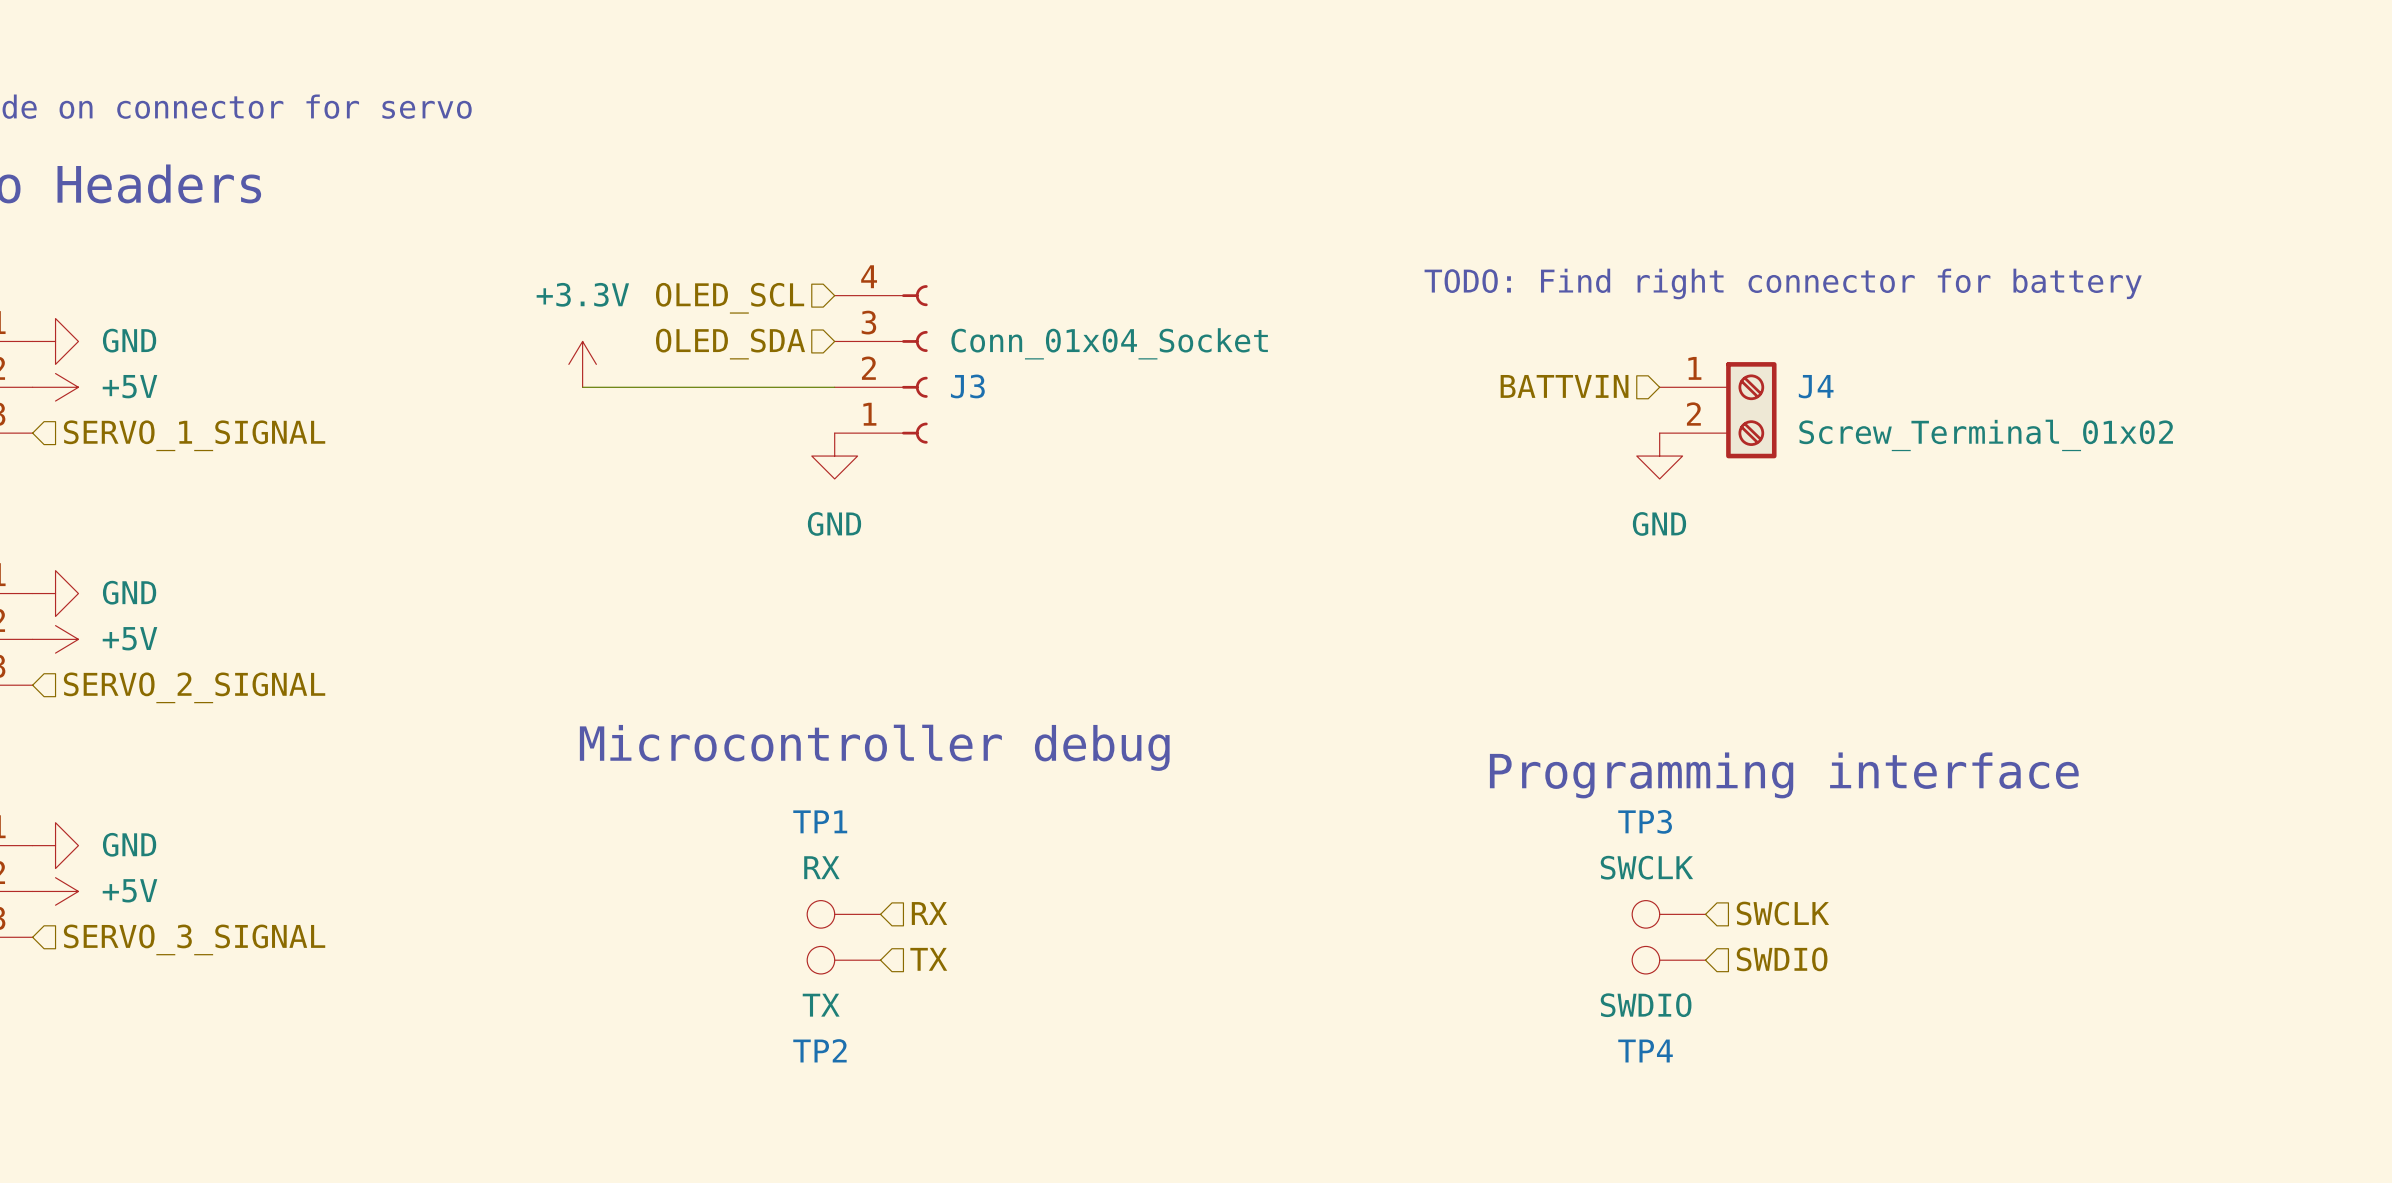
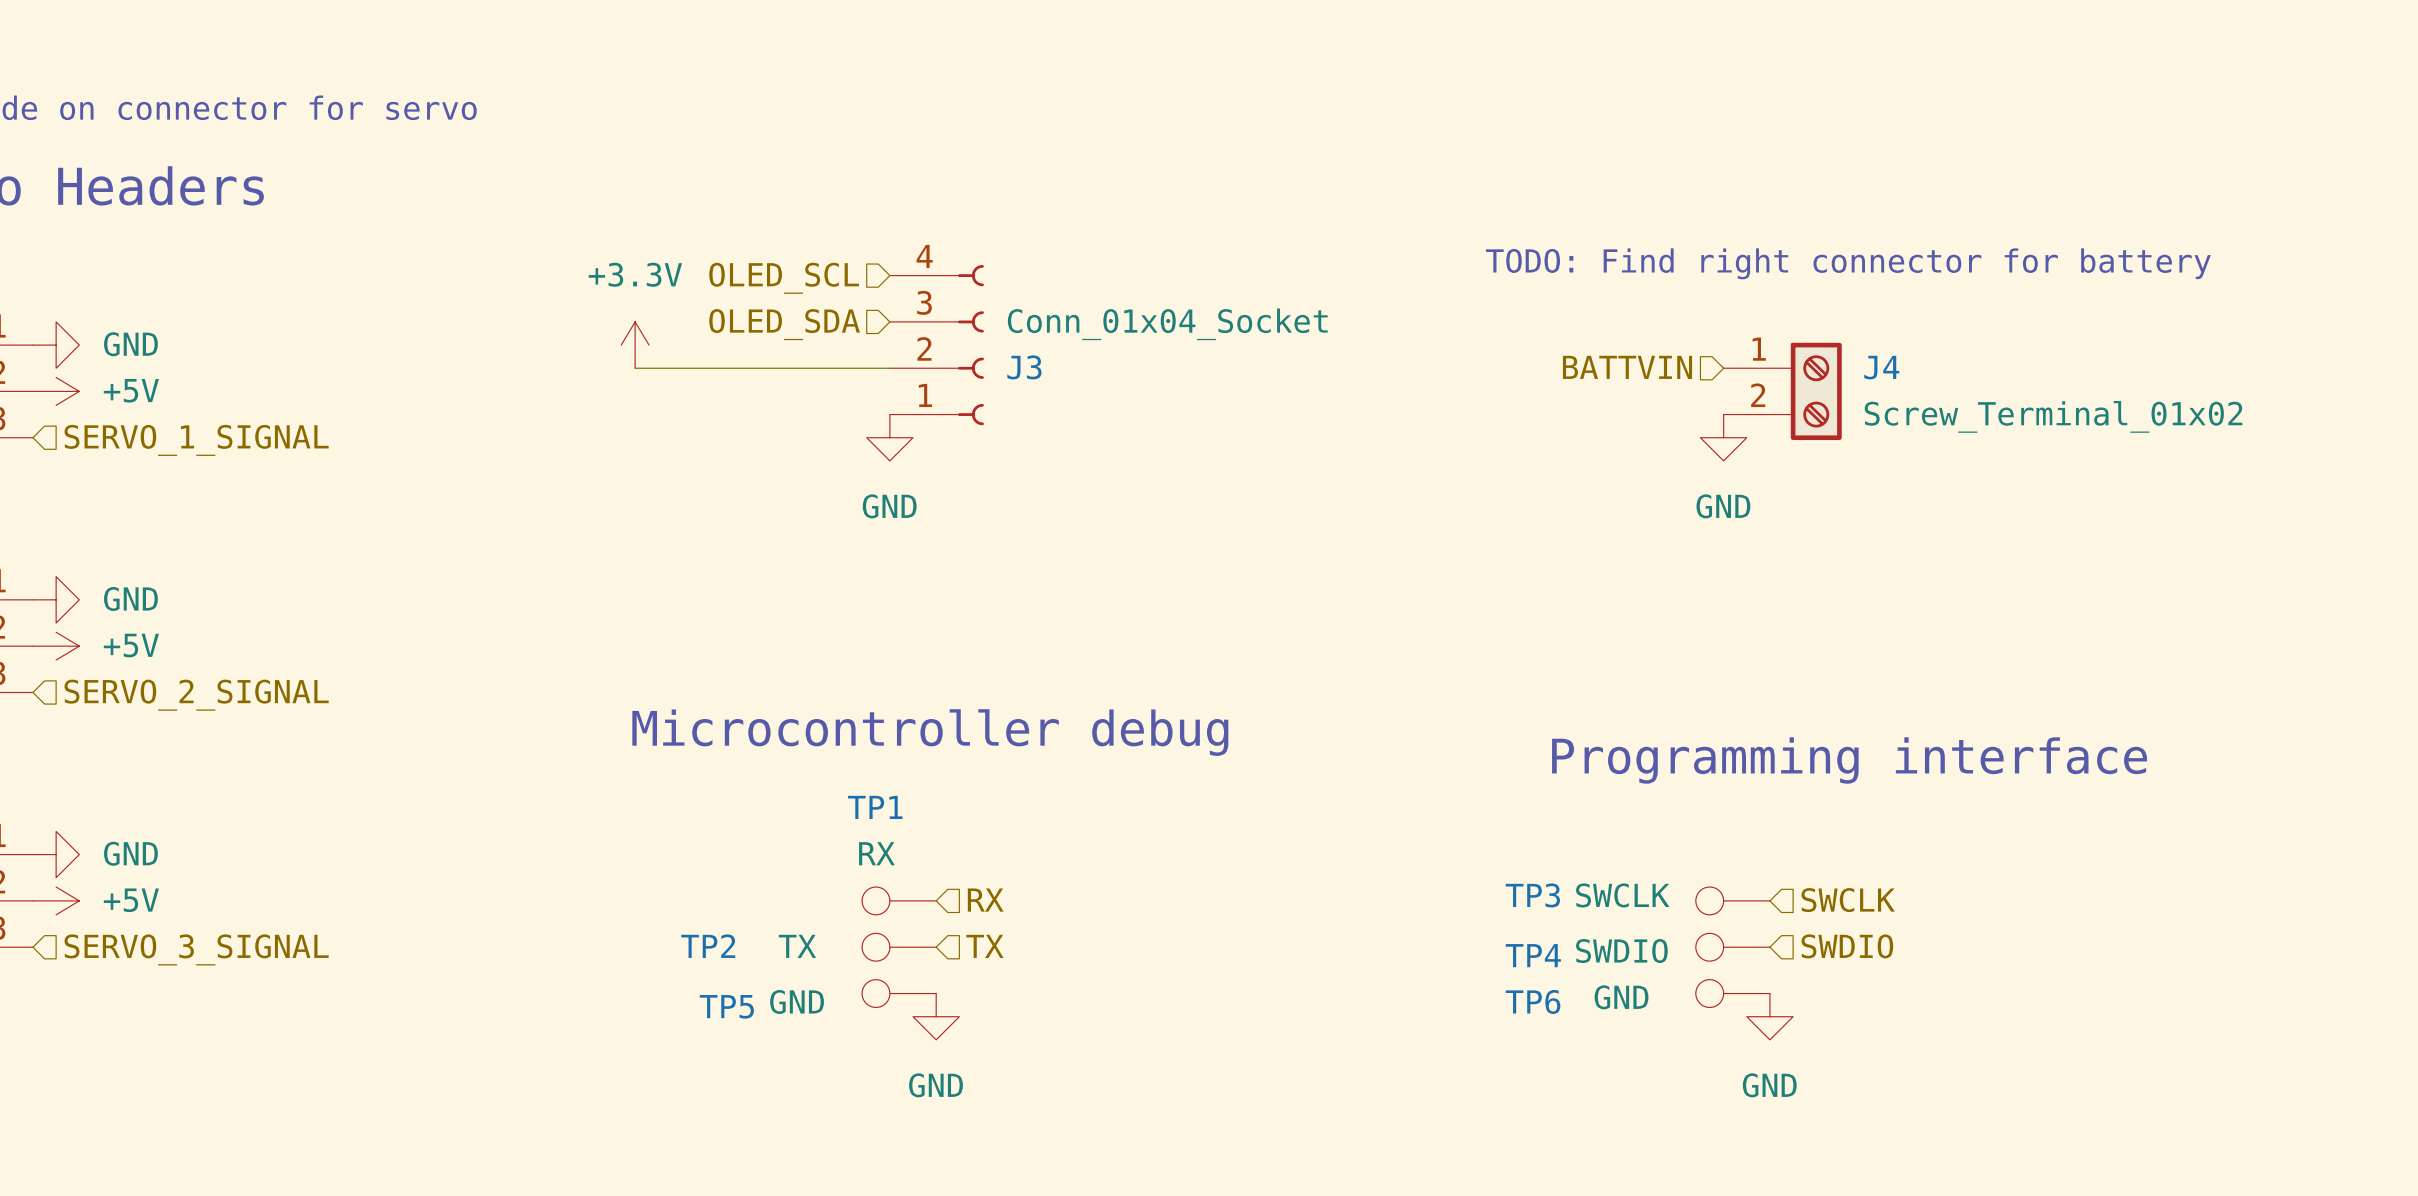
text position: TODO: Find right connector for battery (1783, 283) -> TODO: Find right connector for battery (1848, 263)
hierarchical label position: OLED_SCL (730, 298) -> OLED_SCL (784, 278)
hierarchical label position: OLED_SDA (730, 344) -> OLED_SDA (784, 324)
power symbol position: +3.3V (582, 364) -> +3.3V (635, 345)
J3 position: (881, 364) -> (936, 345)
hierarchical label position: BATTVIN (1564, 386) -> BATTVIN (1627, 367)
wire: (582, 387) (834, 387) -> (635, 368) (889, 368)
J4 position: (1718, 410) -> (1782, 391)
power symbol position: GND (834, 456) -> GND (889, 437)
power symbol position: GND (1659, 456) -> GND (1723, 437)
text position: Microcontroller debug (874, 747) -> Microcontroller debug (930, 732)
text position: Programming interface (1784, 775) -> Programming interface (1849, 760)
TP3 name position: TP3 (1645, 821) -> TP3 (1532, 895)
TP3 value position: SWCLK (1646, 867) -> SWCLK (1622, 895)
hierarchical label position: RX (929, 913) -> RX (985, 900)
hierarchical label position: SWCLK (1782, 913) -> SWCLK (1848, 900)
TP1 position: (843, 914) -> (899, 900)
TP3 position: (1668, 914) -> (1732, 900)
hierarchical label position: TX (928, 959) -> TX (984, 946)
hierarchical label position: SWDIO (1782, 959) -> SWDIO (1847, 946)
TP2 position: (843, 960) -> (899, 947)
TP4 position: (1668, 960) -> (1732, 947)
TP5: none -> GND (899, 993)
TP6: none -> GND (1732, 993)
TP2 value position: TX (821, 1005) -> TX (797, 946)
TP4 value position: SWDIO (1646, 1005) -> SWDIO (1621, 951)
power symbol: none -> GND (936, 1016)
power symbol: none -> GND (1769, 1016)
TP2 name position: TP2 (819, 1050) -> TP2 (708, 946)
TP4 name position: TP4 (1645, 1051) -> TP4 (1533, 955)

